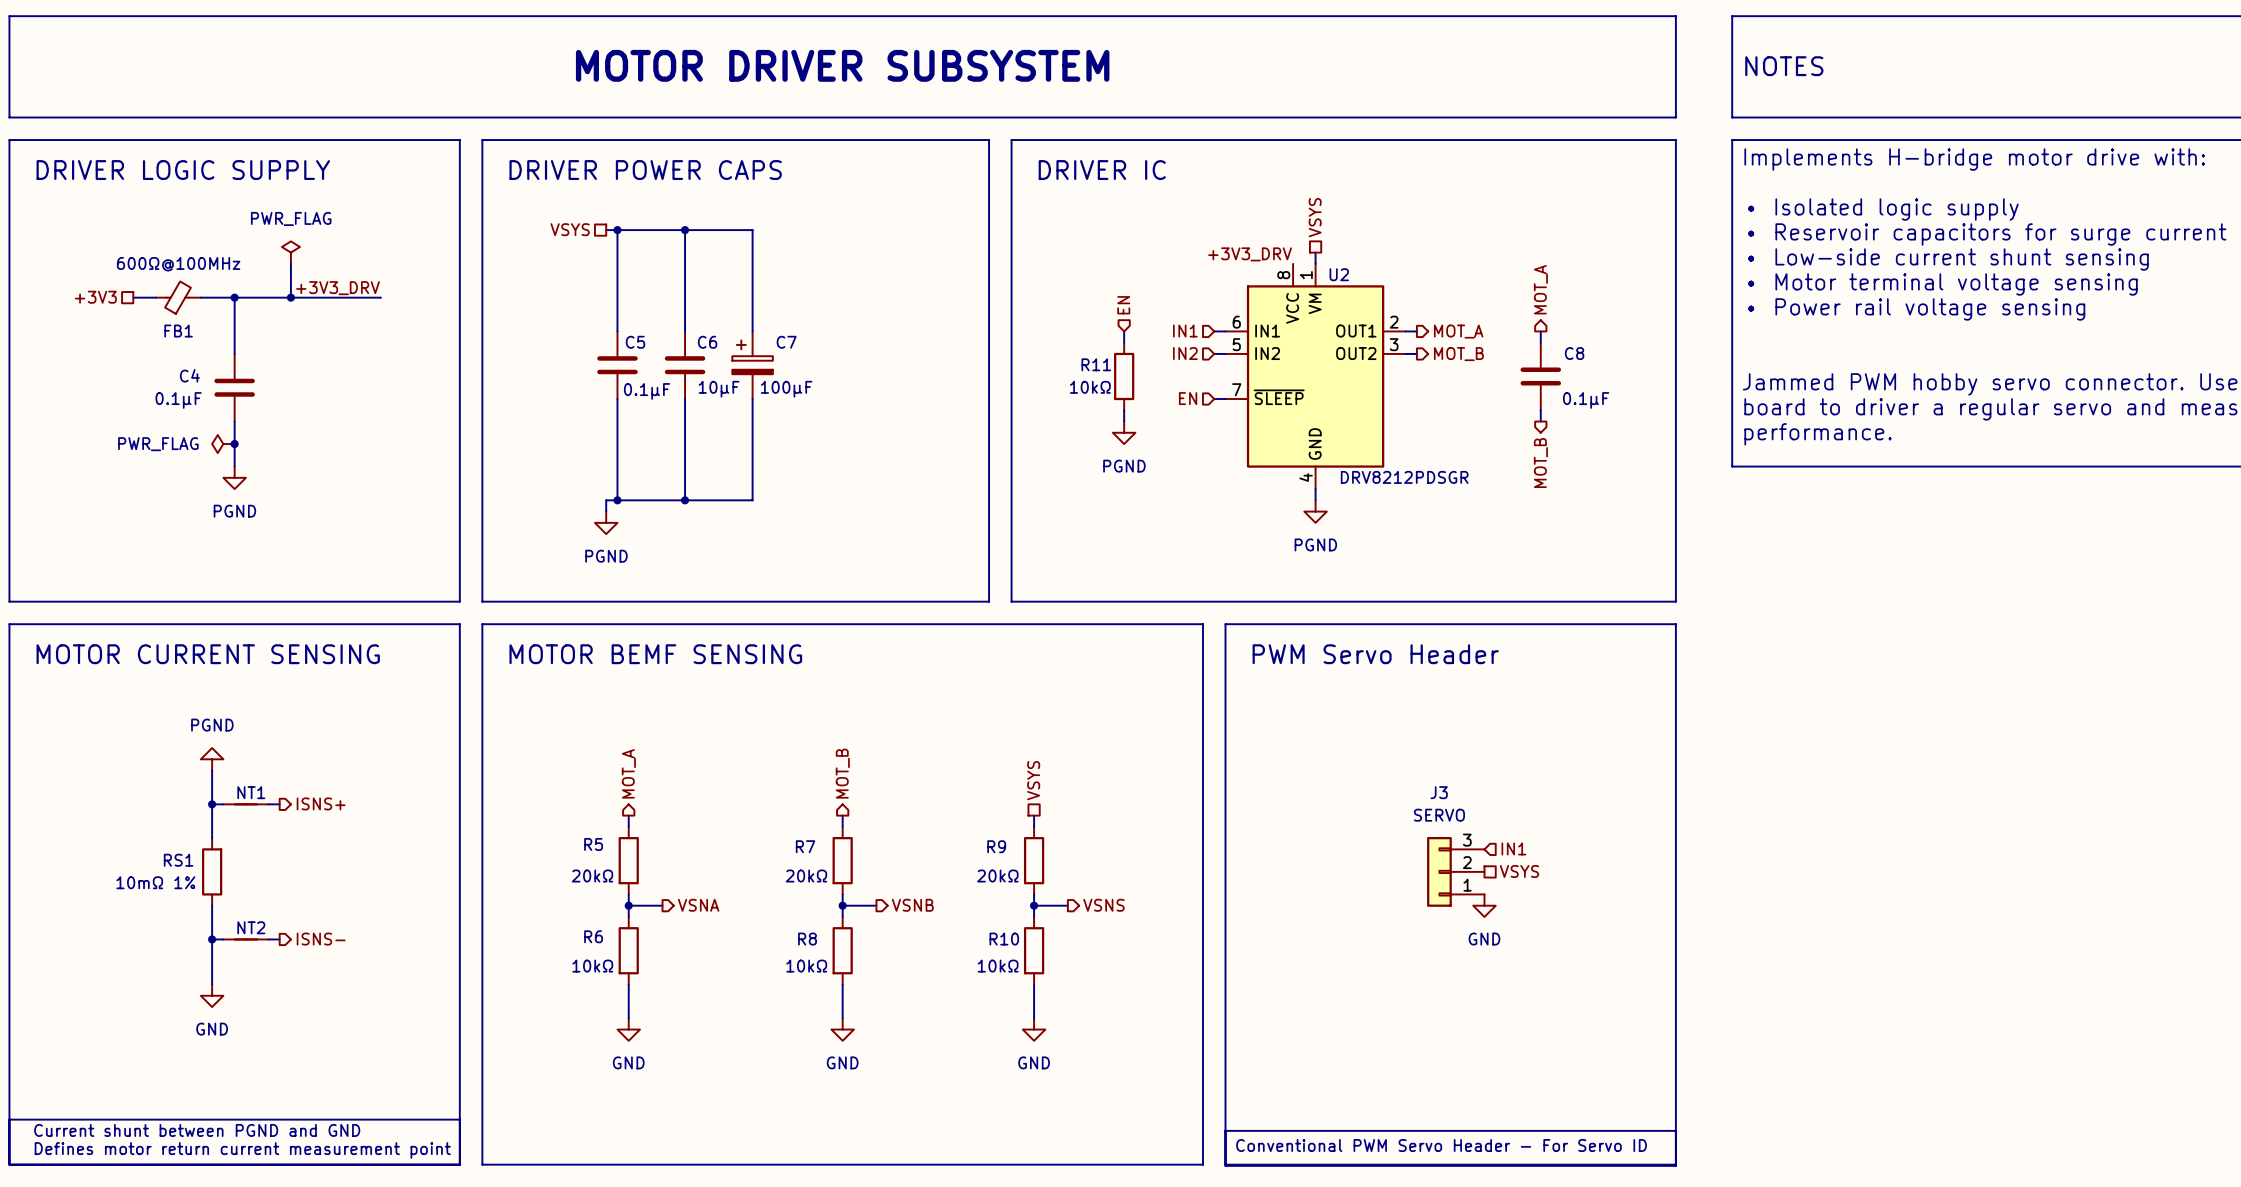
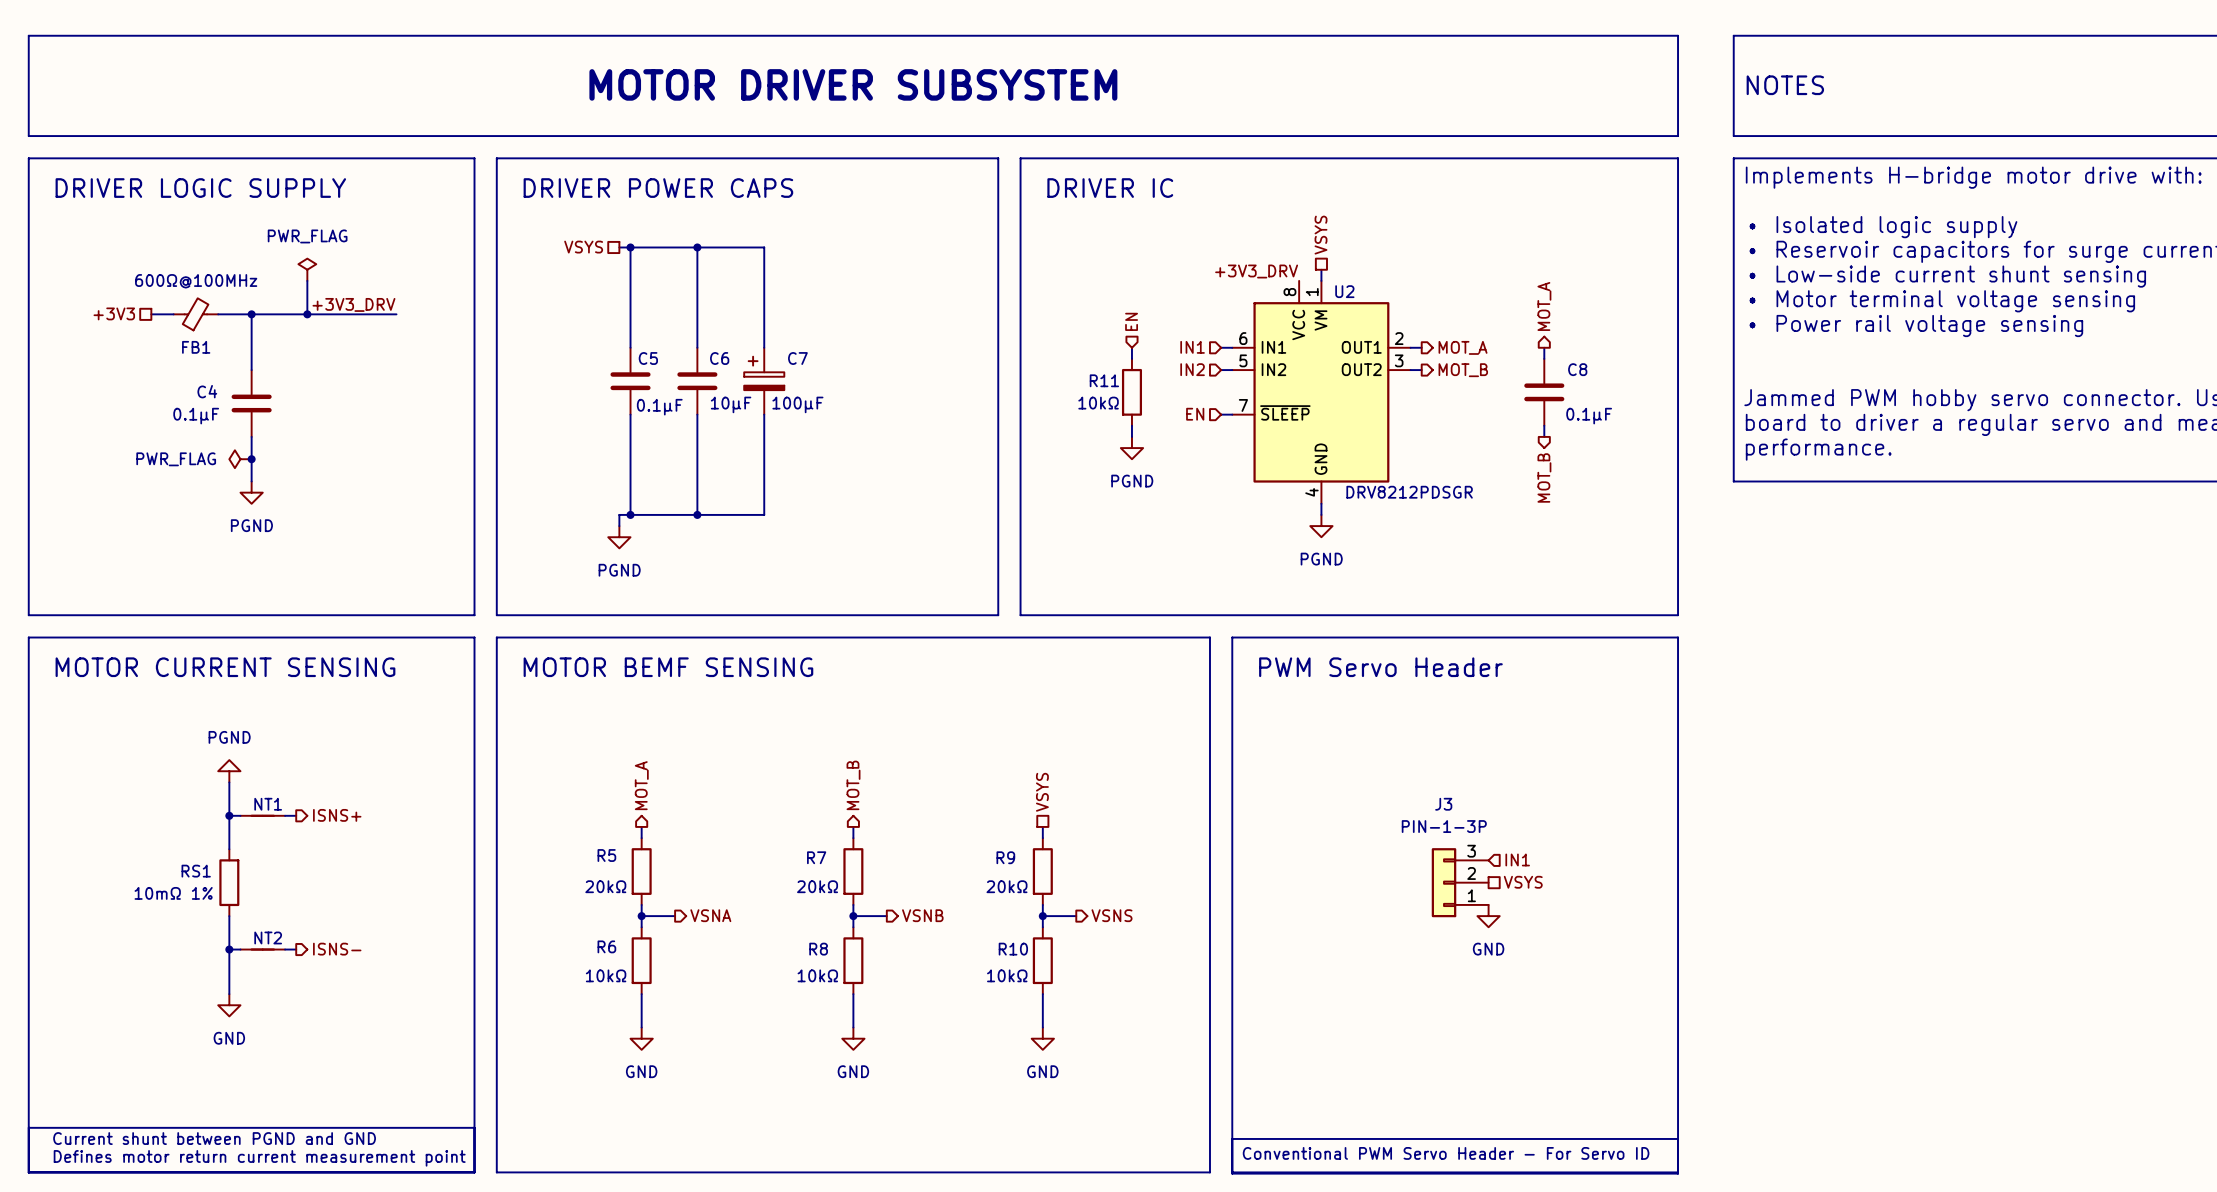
J3 value: SERVO (1439, 815) -> PIN-1-3P (1444, 826)

